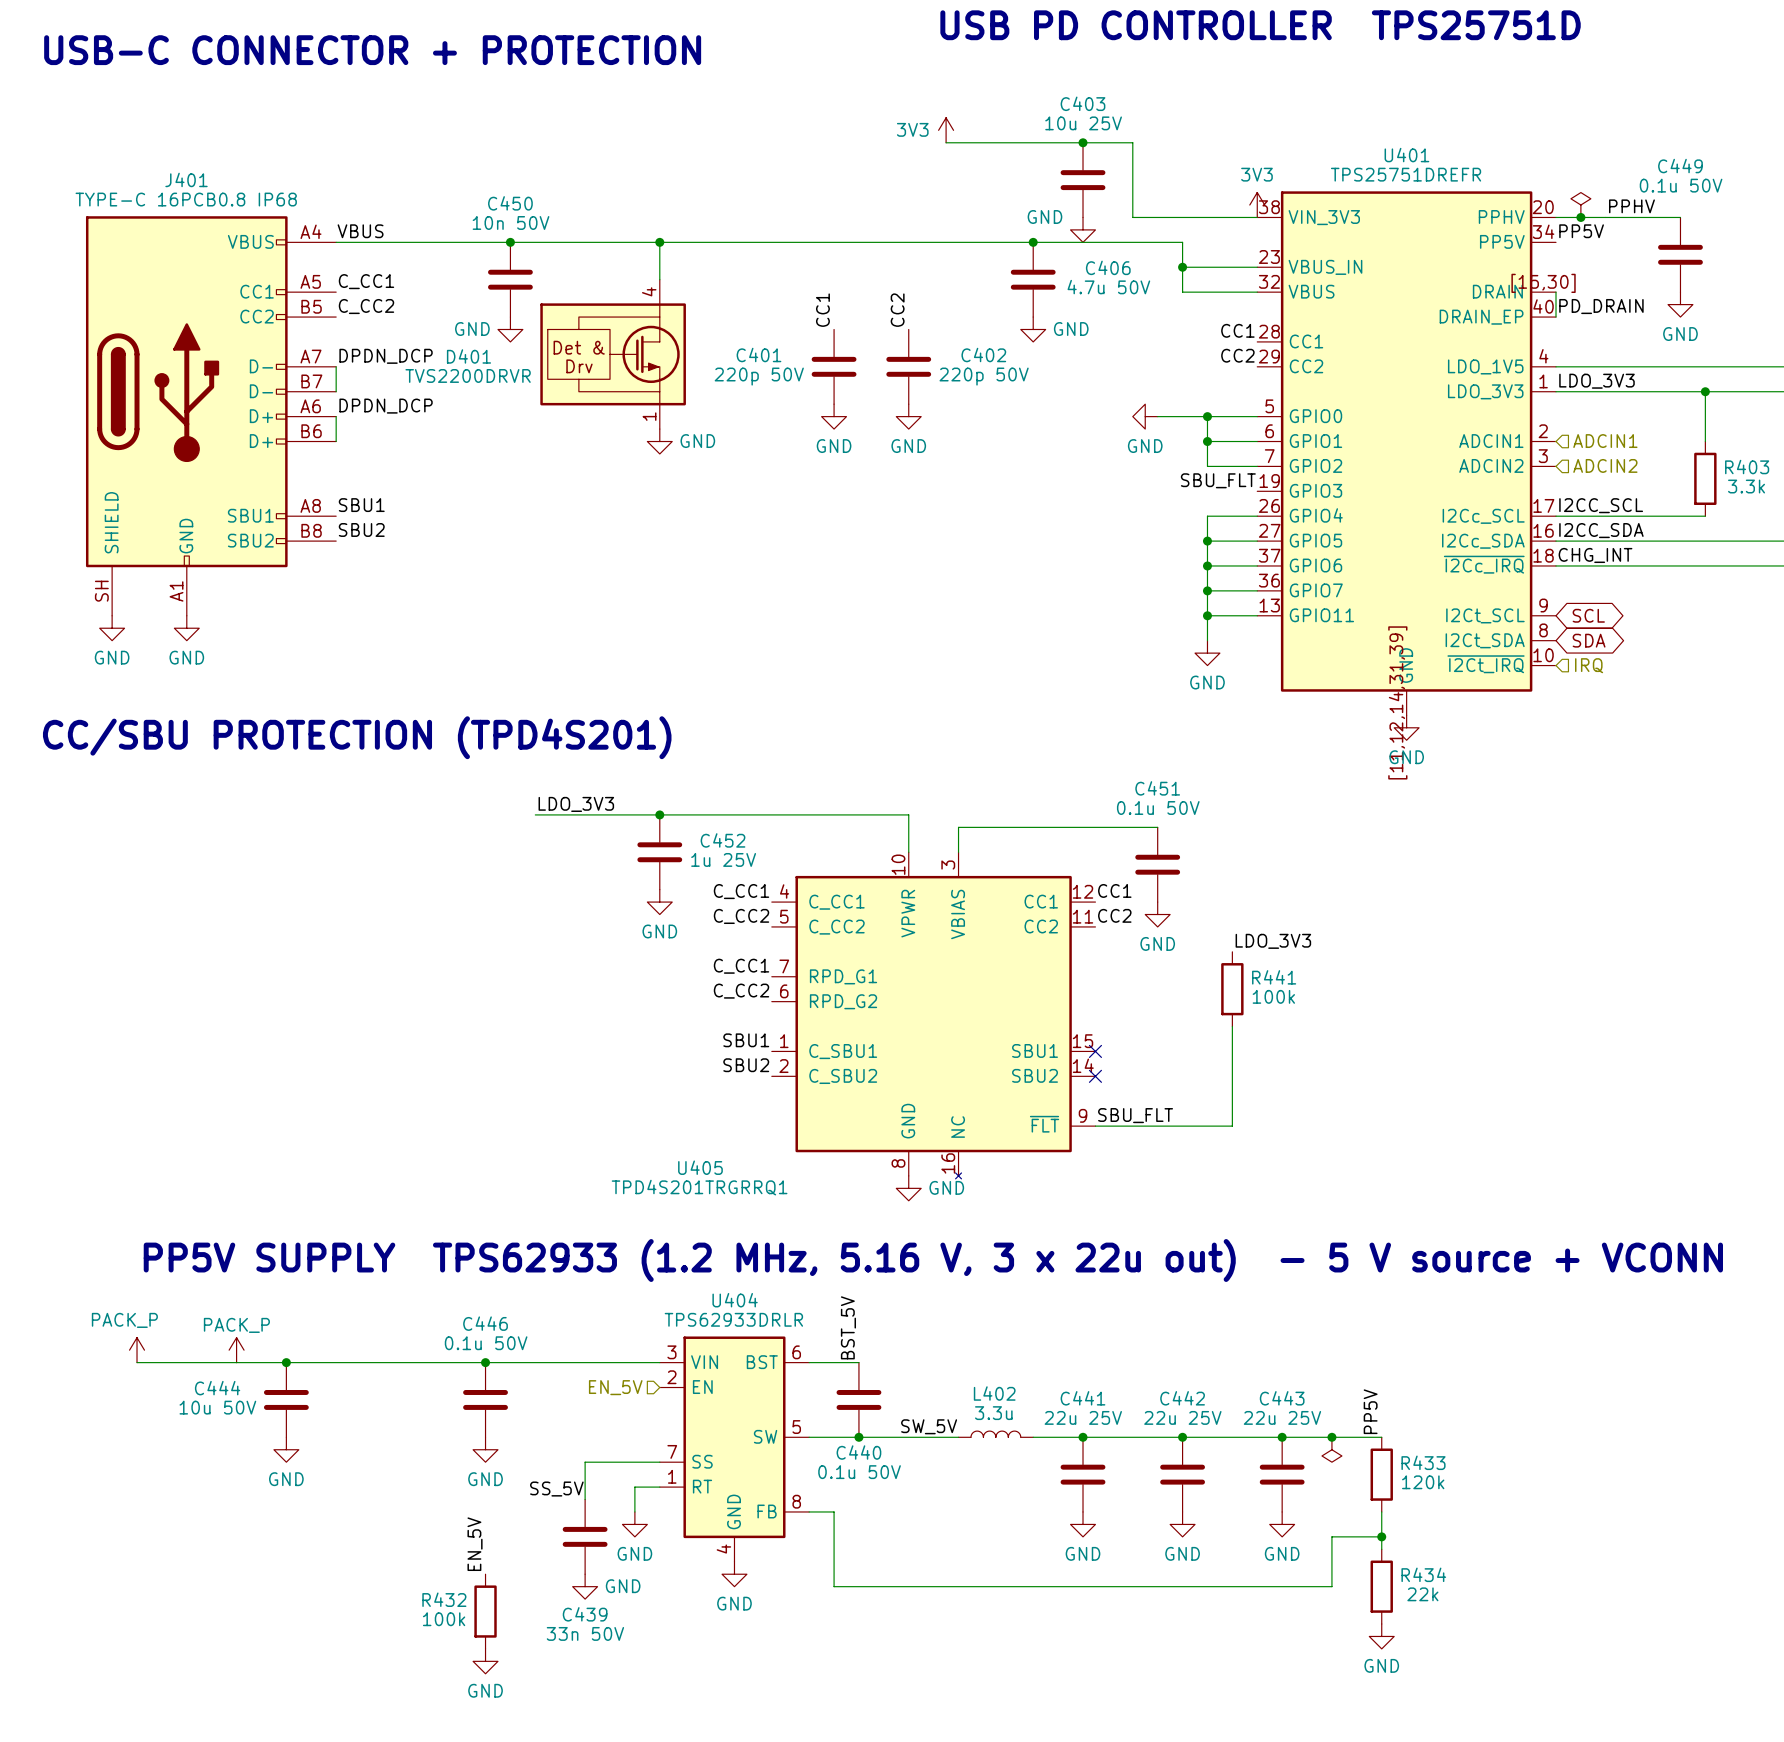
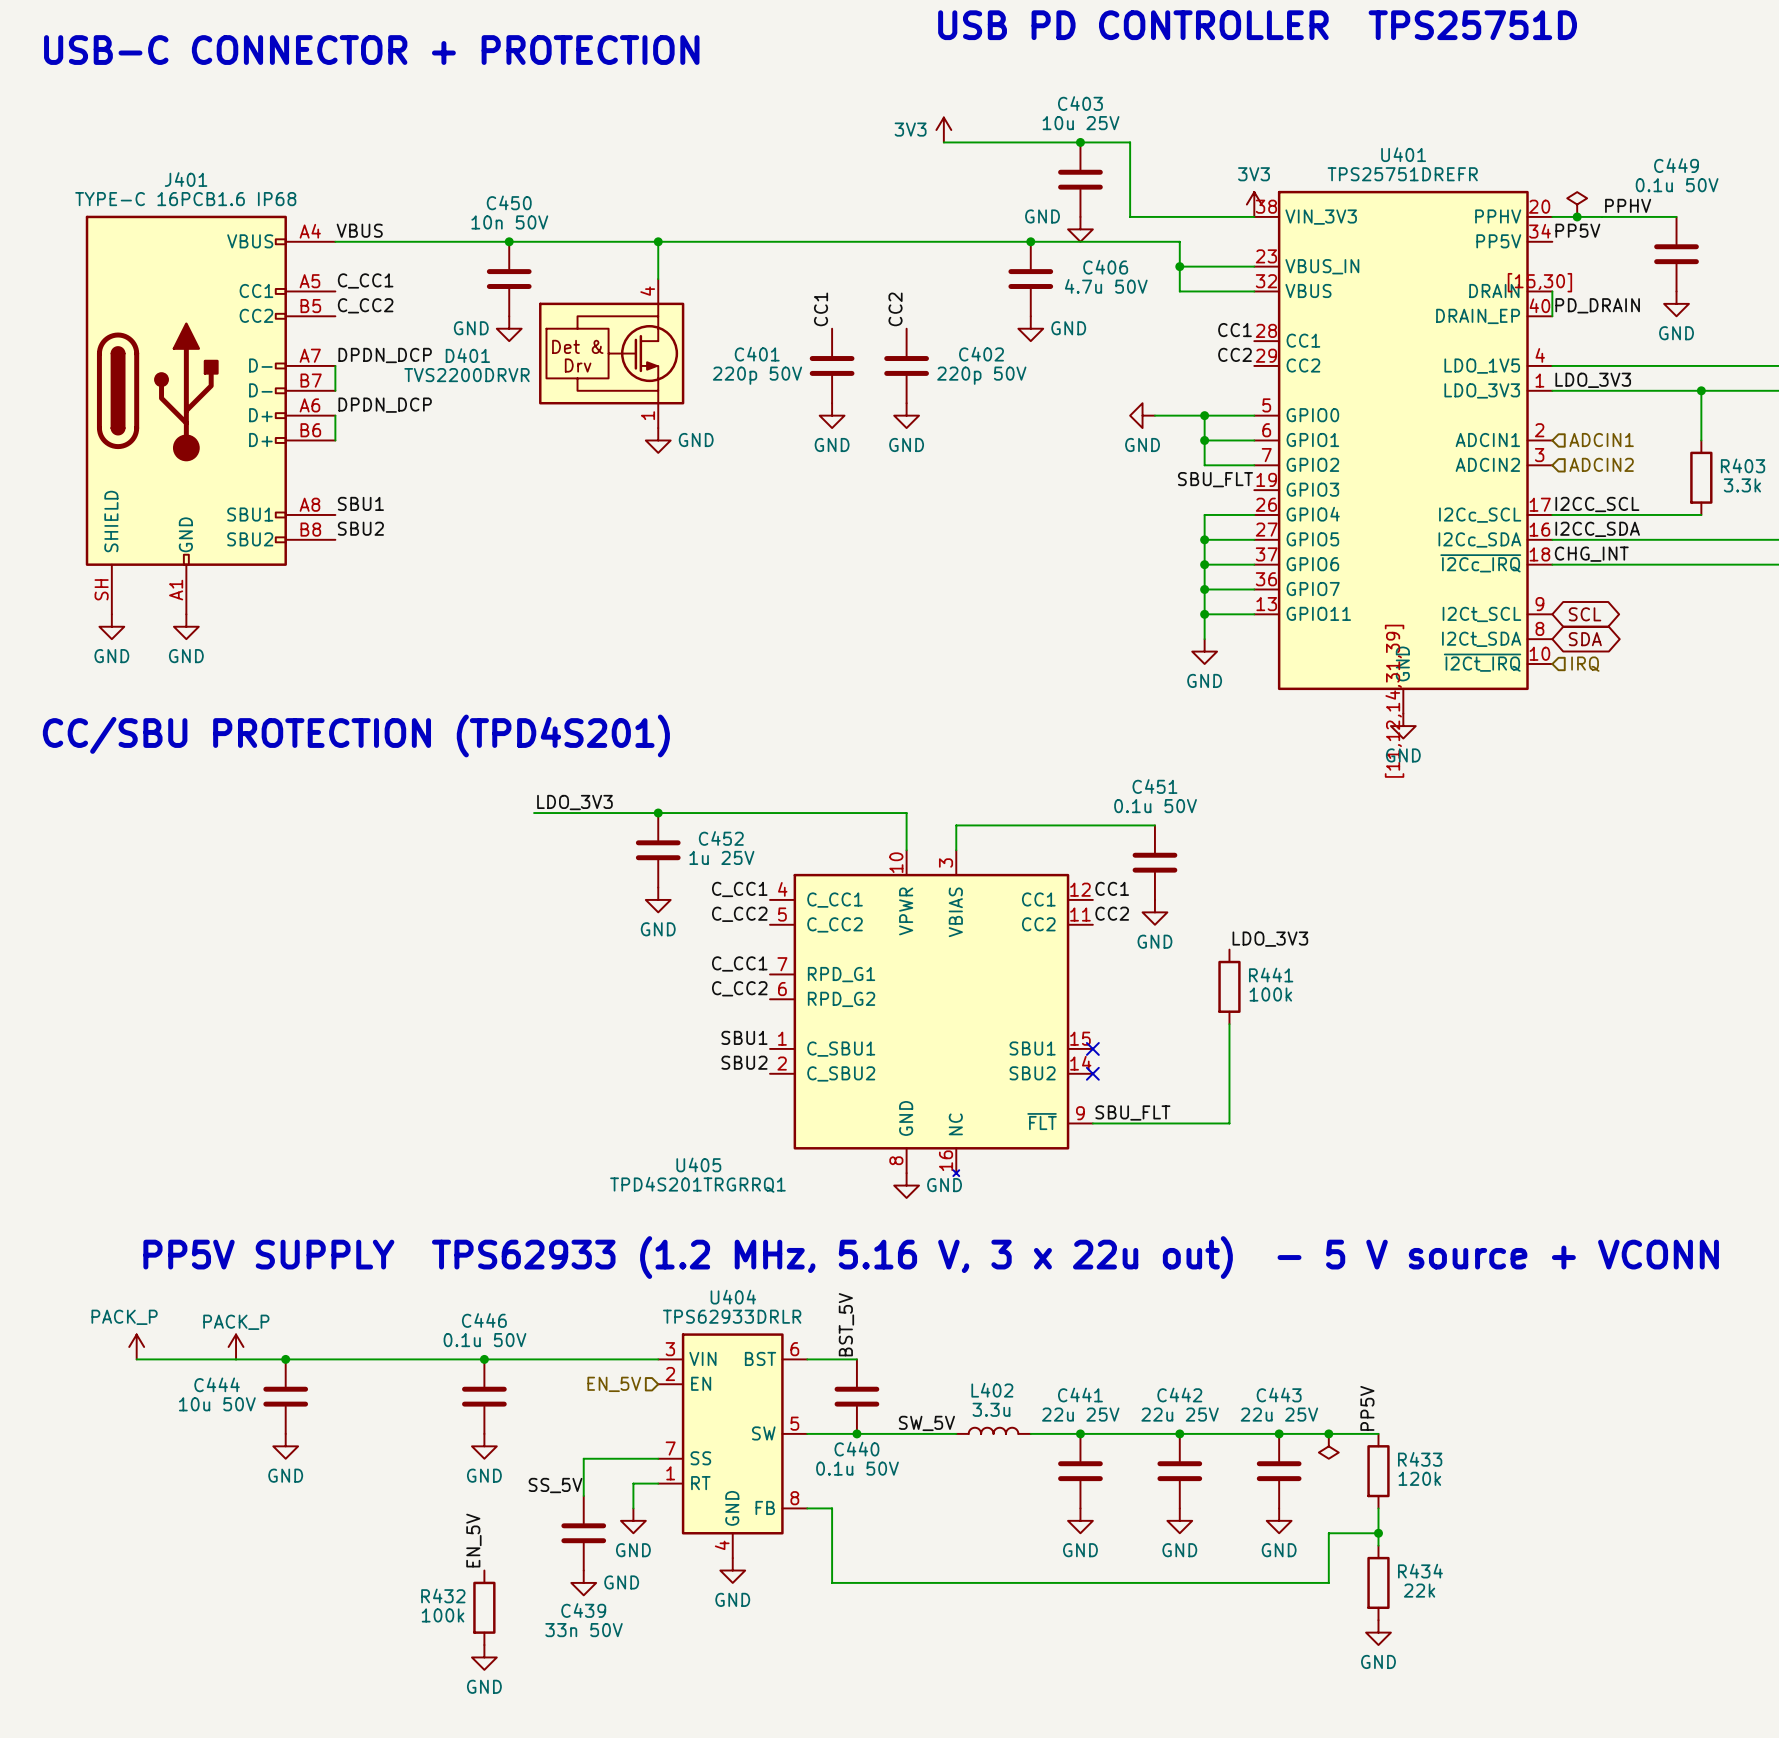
J401 value: TYPE-C 16PCB0.8 IP68 (186, 199) -> TYPE-C 16PCB1.6 IP68 (185, 199)

